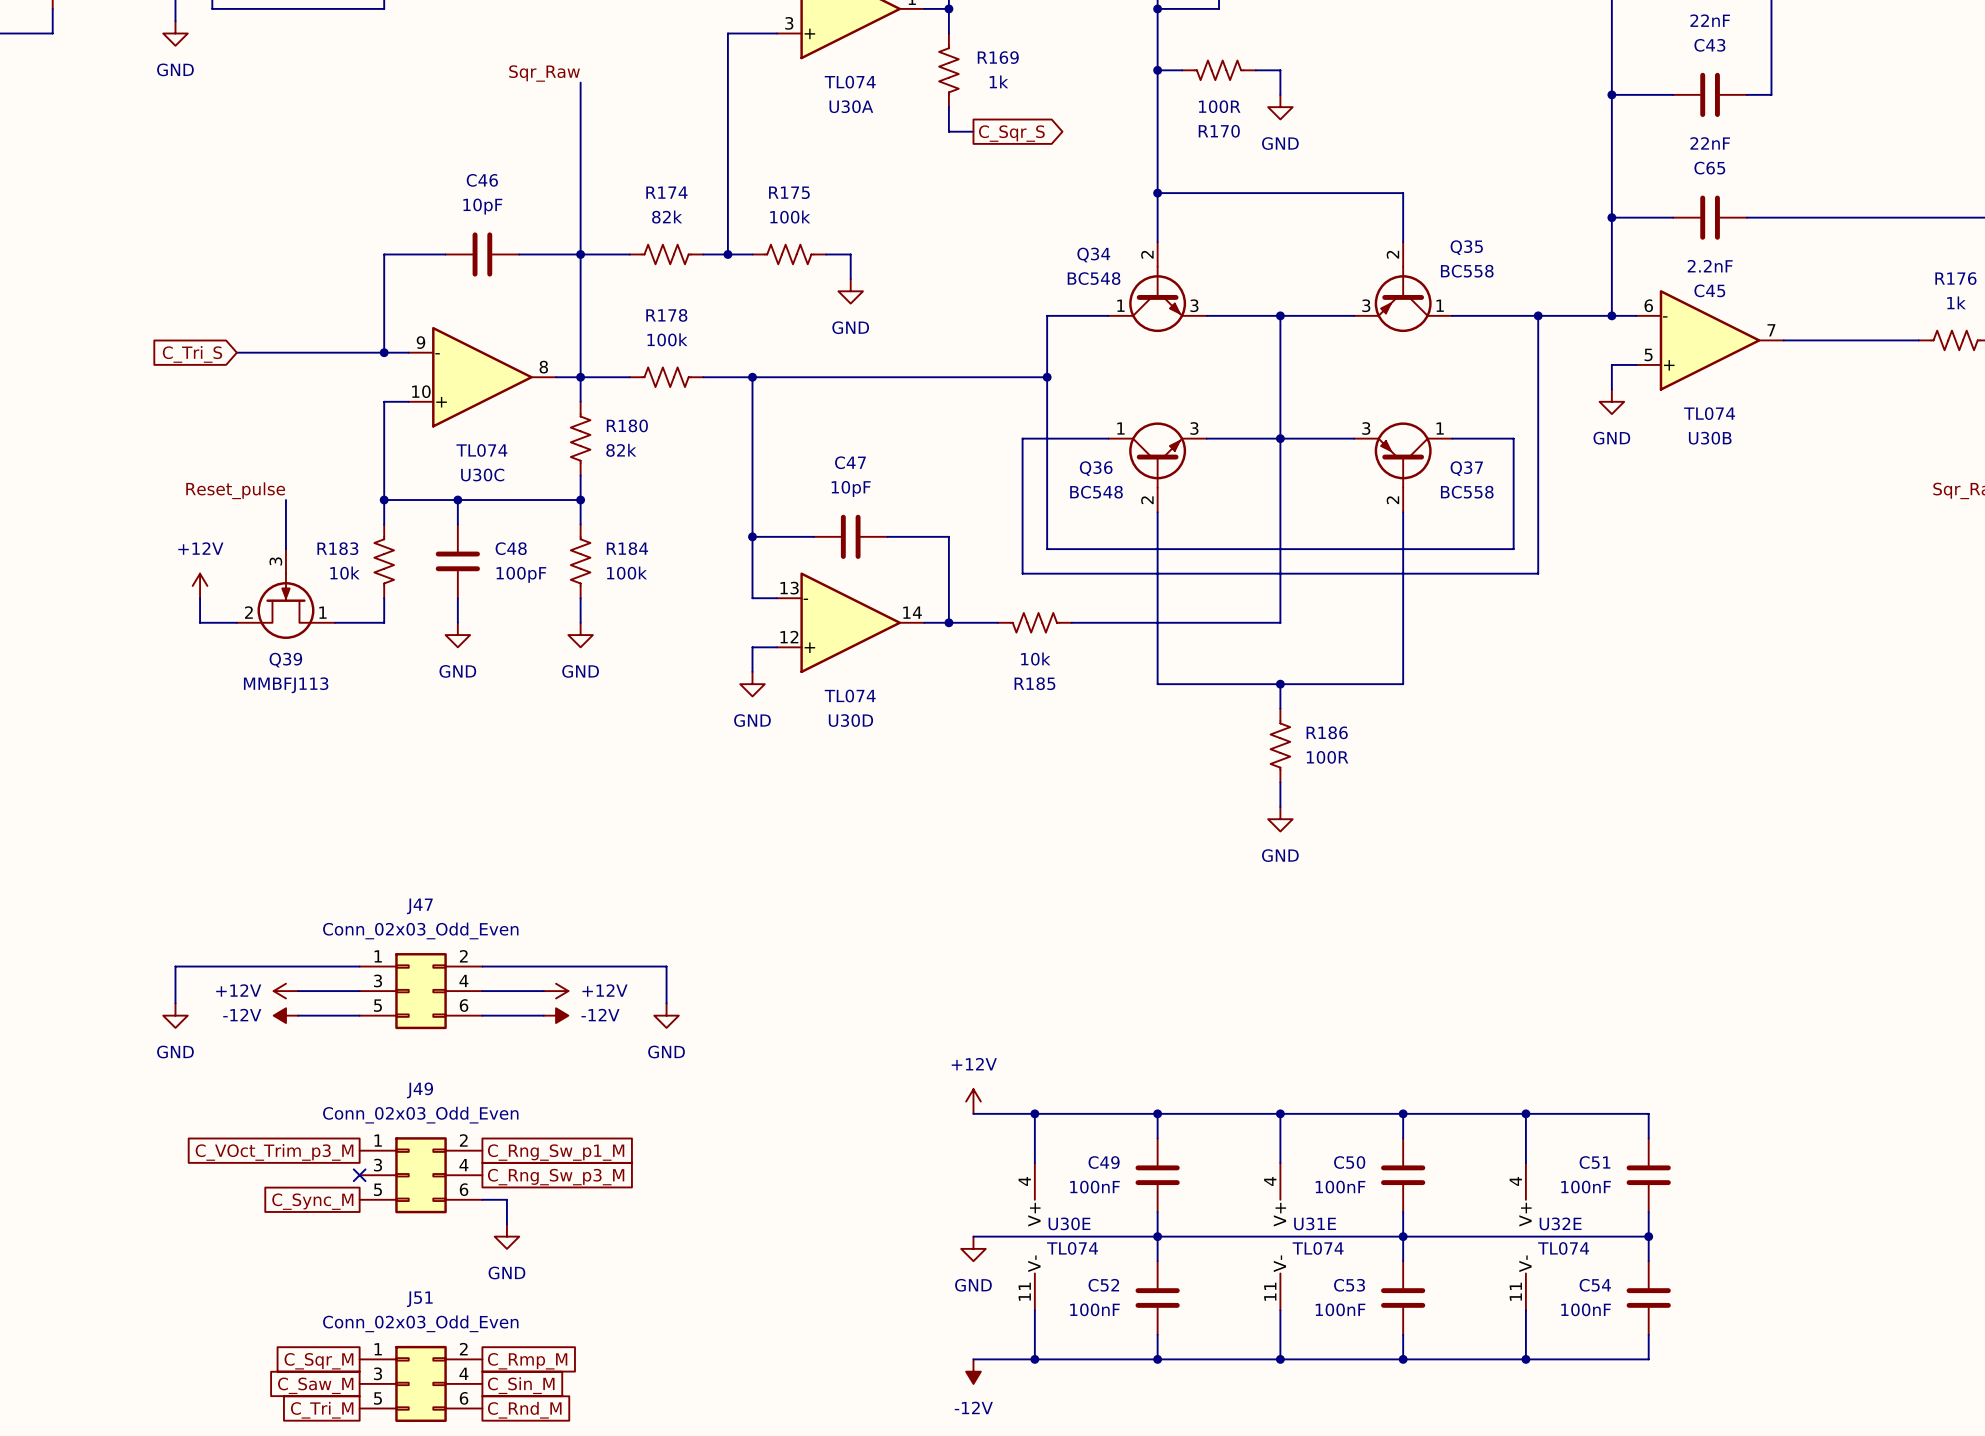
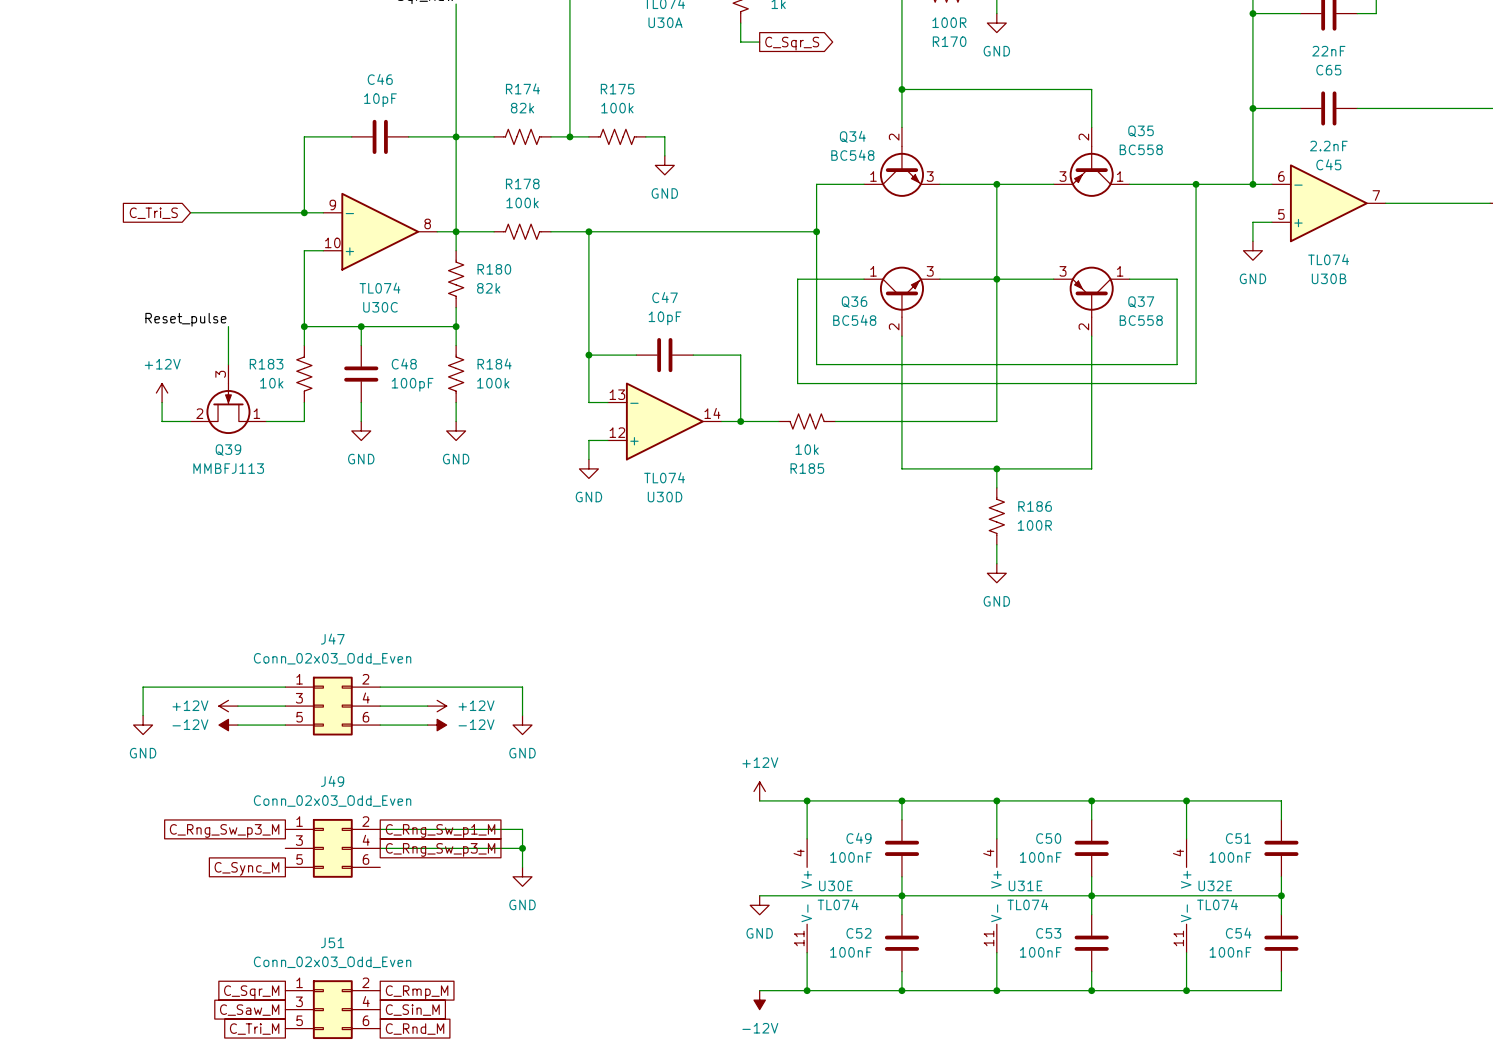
wire: none -> (380, 829) (522, 829) (522, 867)
global label: C_VOct_Trim_p3_M (274, 1152) -> C_Rng_Sw_p3_M (224, 830)
no-connect mark: (359, 1175) -> none
wire: none -> (380, 848) (522, 848)
junction: none -> (522, 848)
wire: (482, 1199) (506, 1199) (506, 1224) -> none
power symbol position: GND (506, 1236) -> GND (522, 876)

